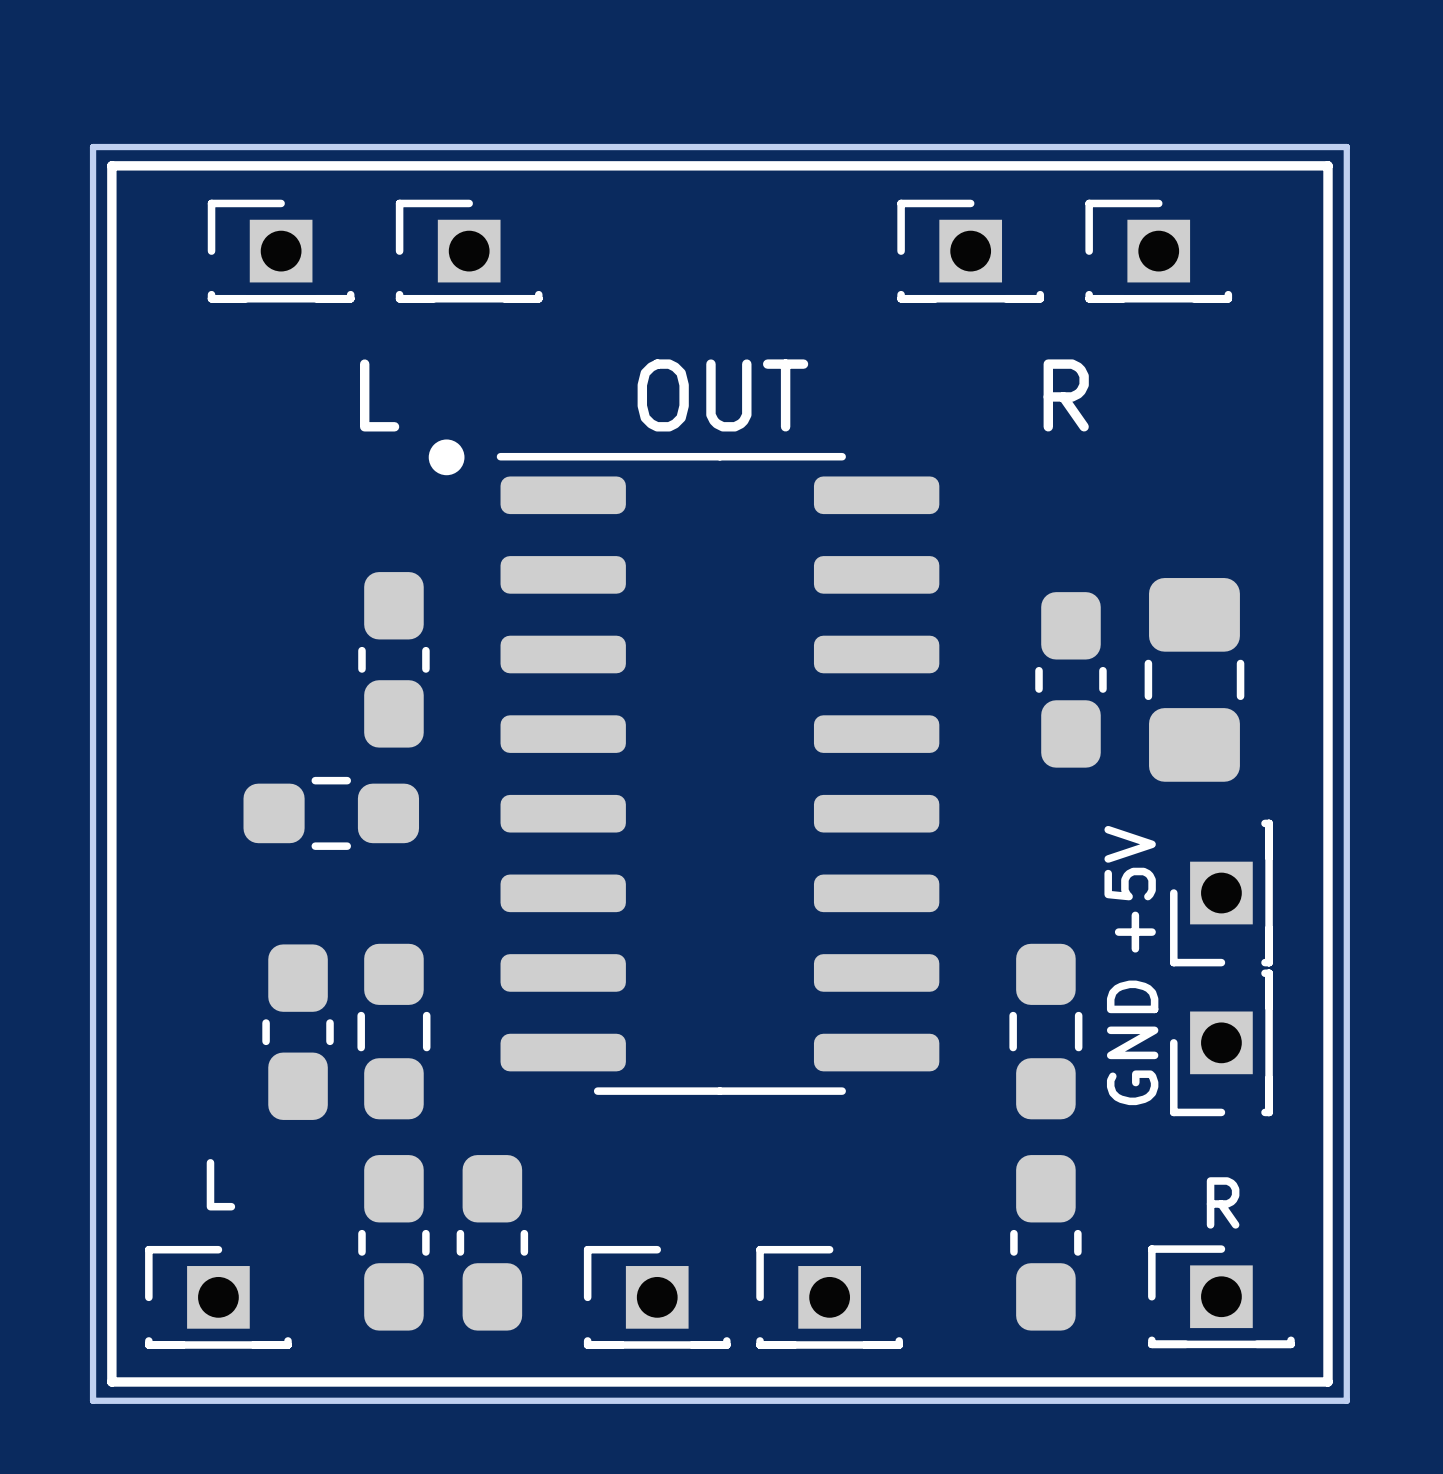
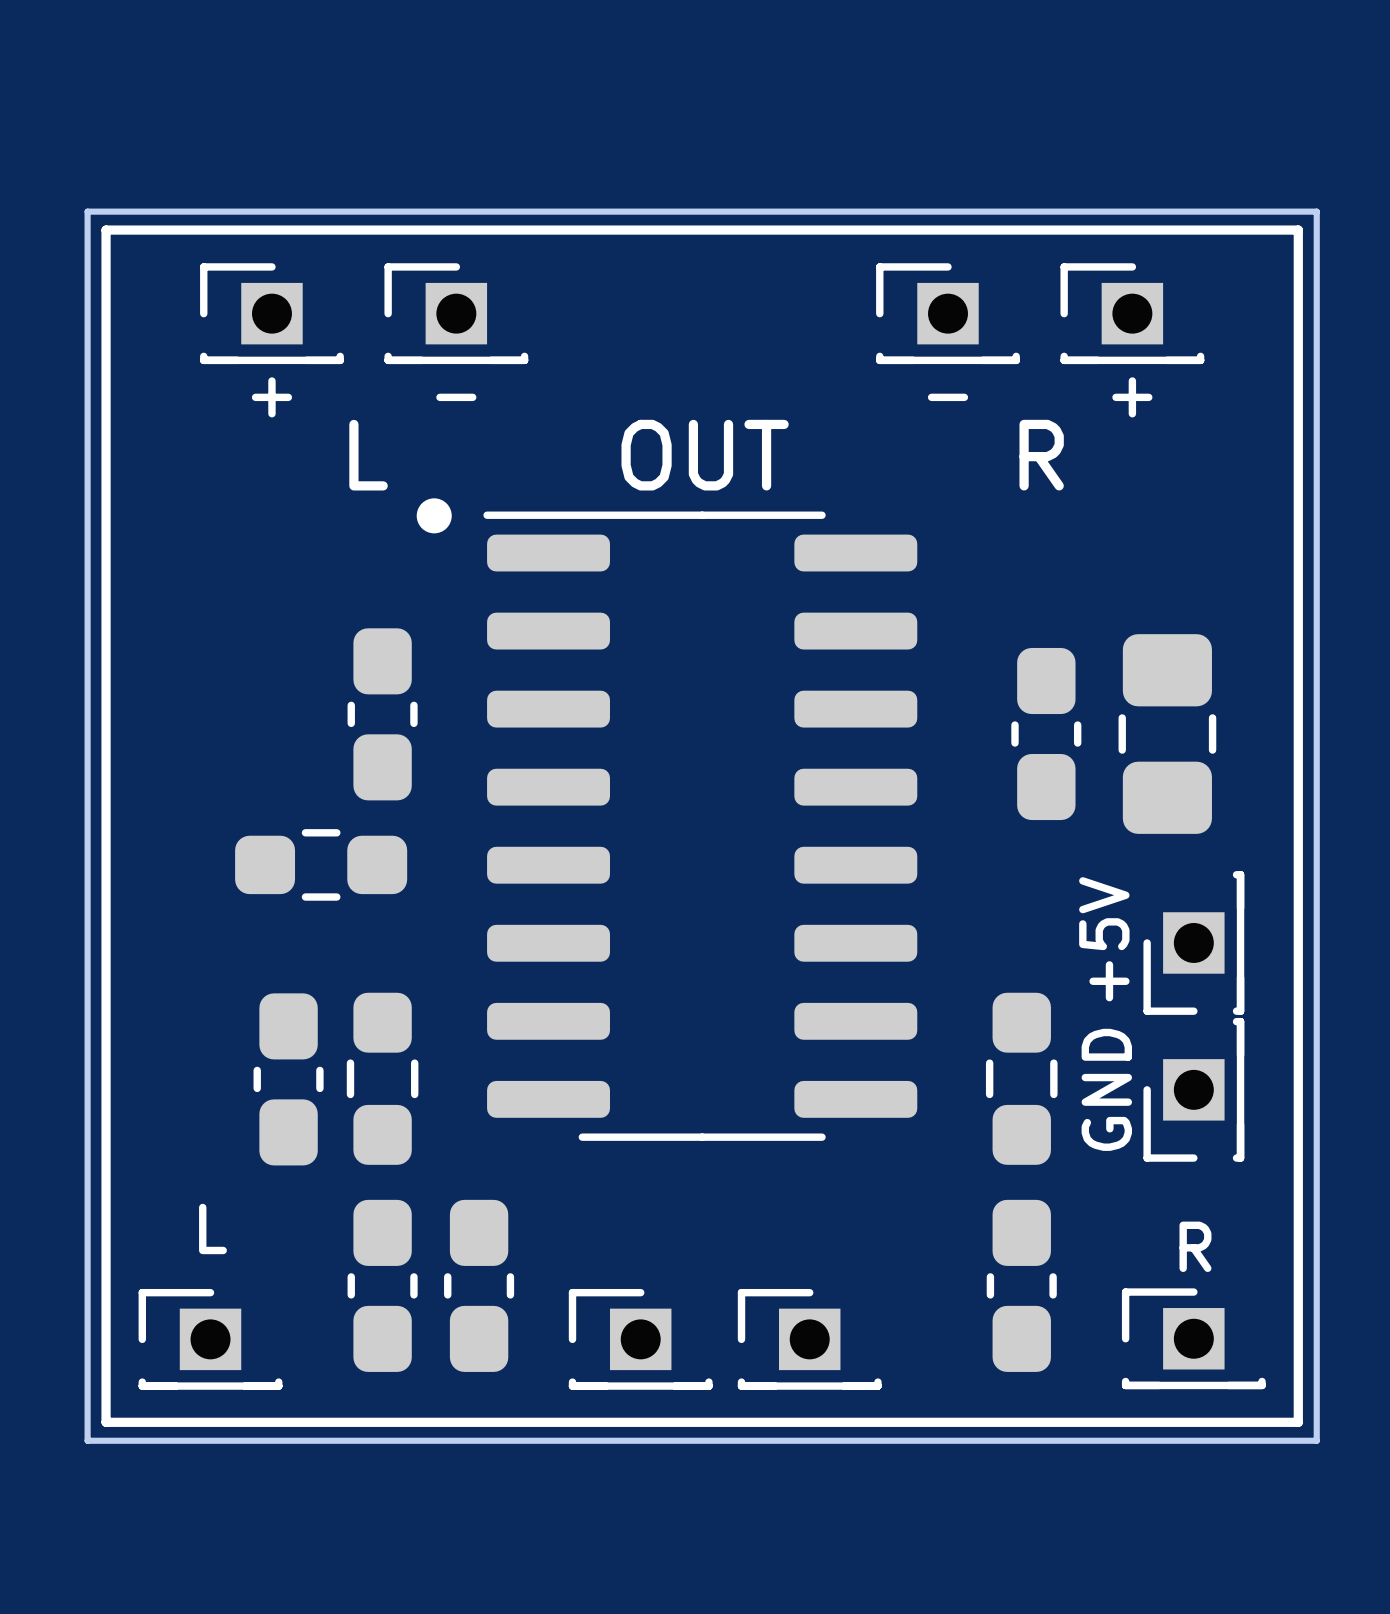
part name: none -> + (271, 397)
part name: none -> - (456, 397)
part name: none -> - (948, 397)
part name: none -> + (1132, 397)

